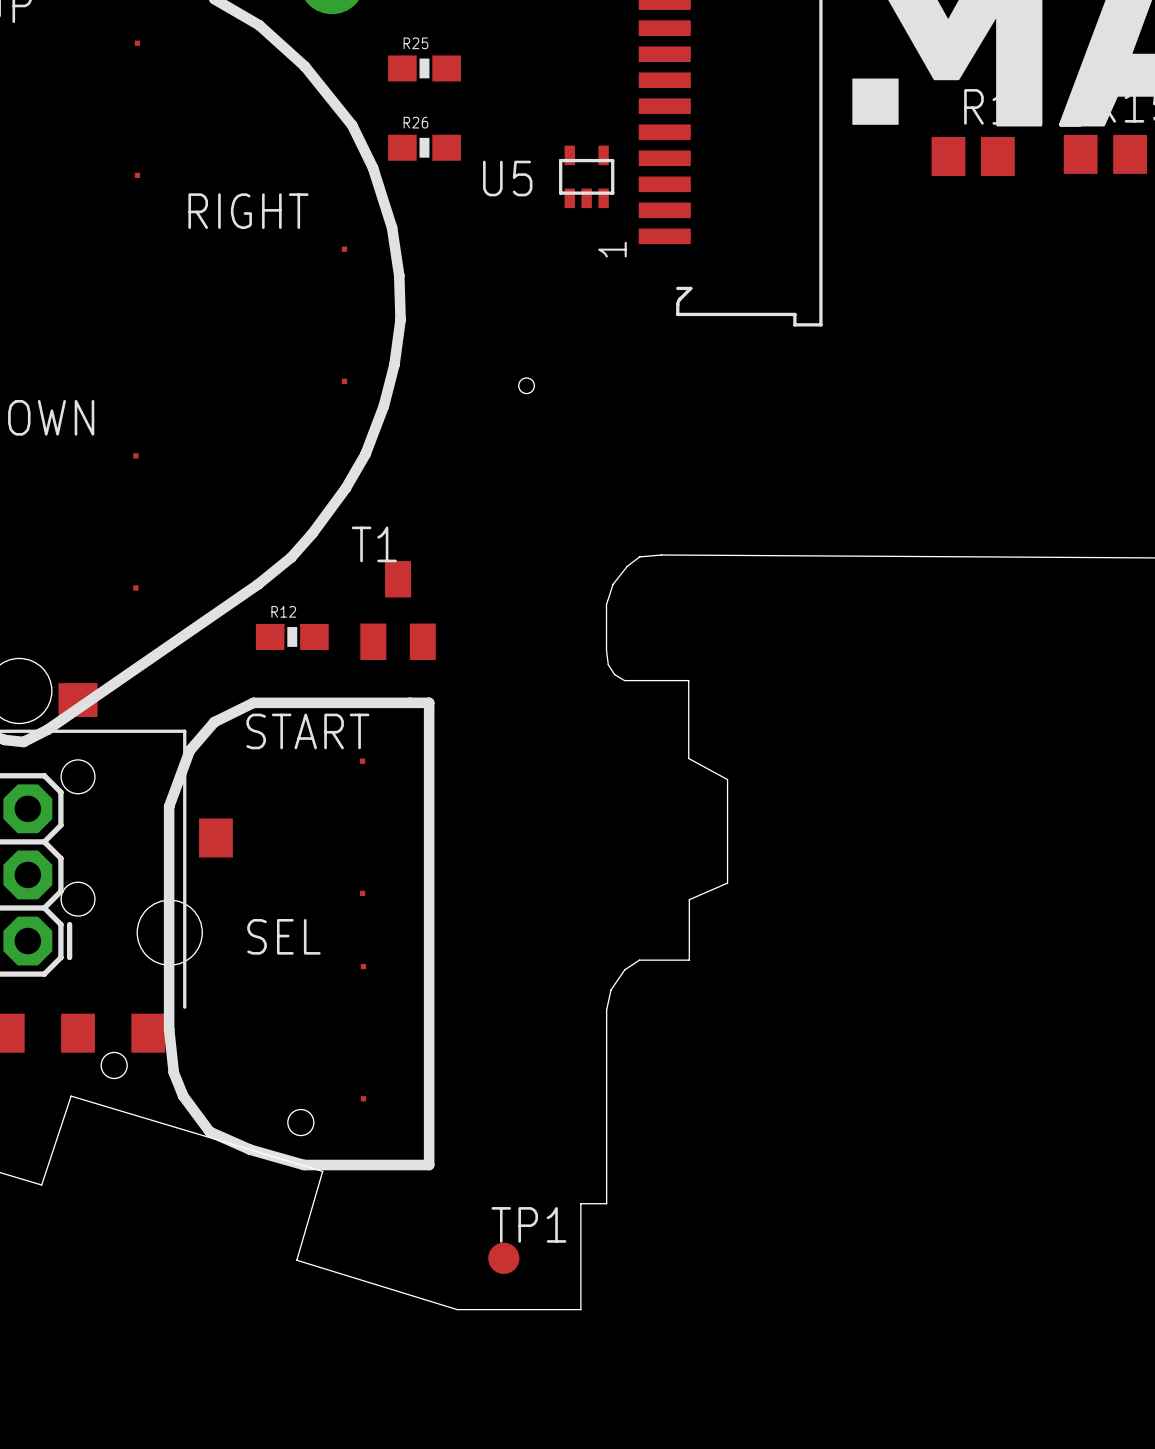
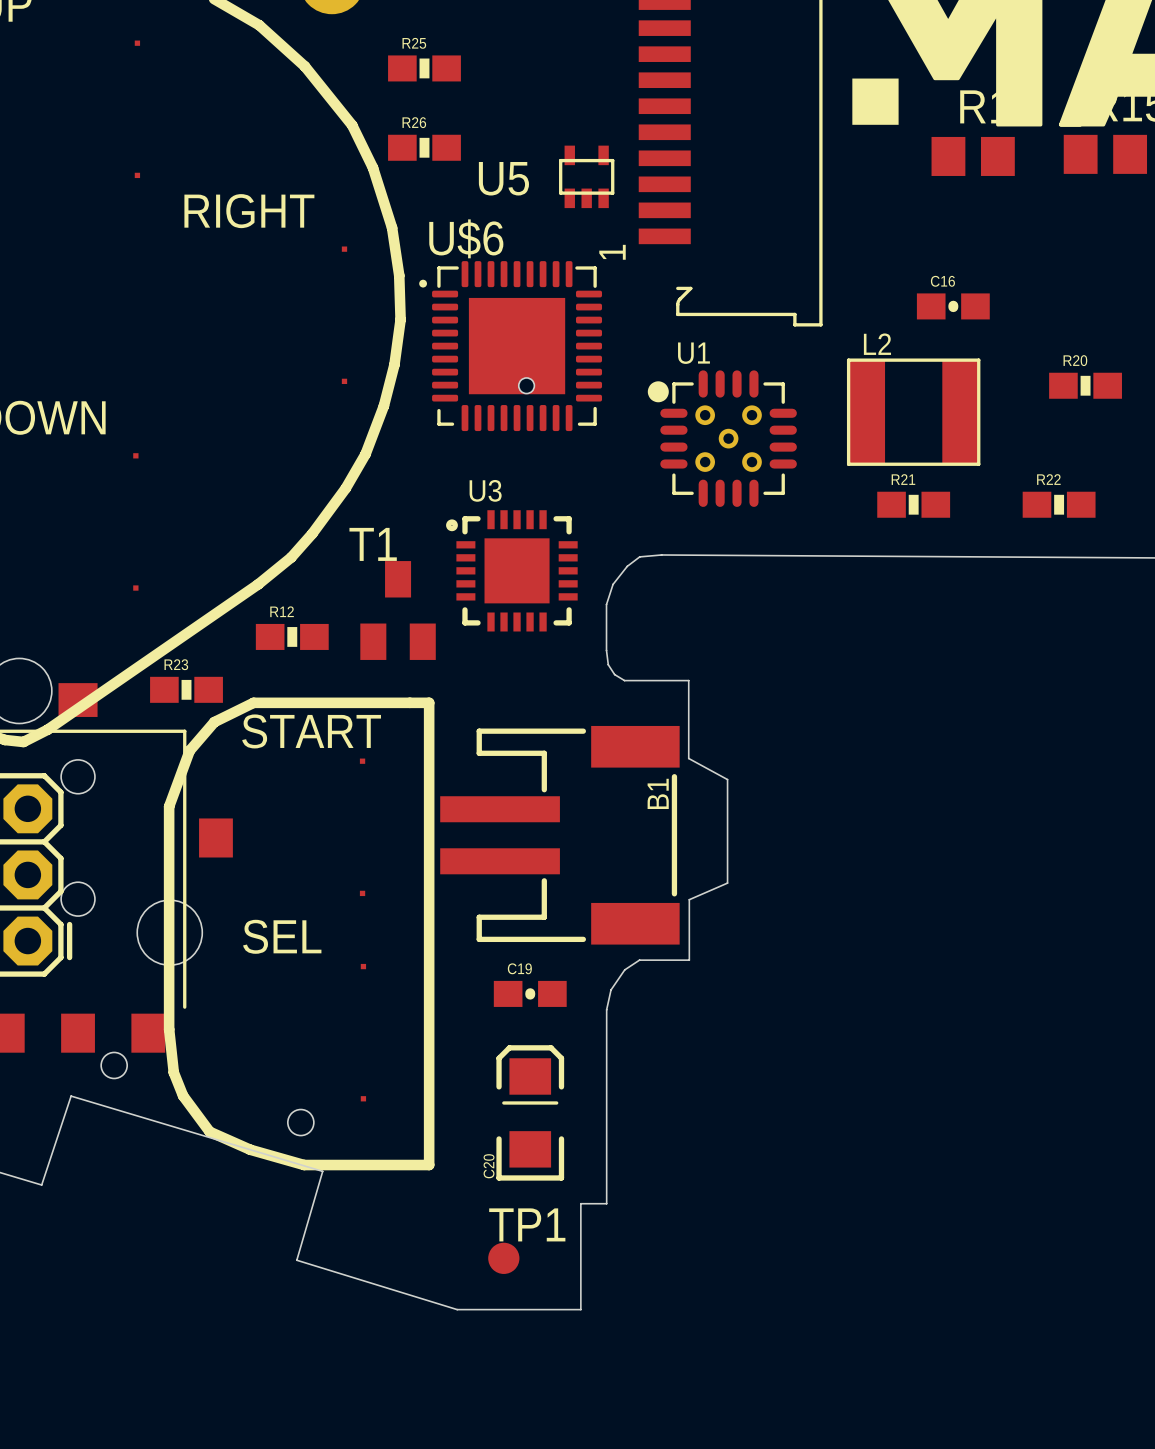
C16: none -> (953, 306)
U$6: none -> (510, 346)
R20: none -> (1085, 385)
L2: none -> (913, 412)
U1: none -> (722, 438)
R21: none -> (913, 504)
R22: none -> (1059, 504)
U3: none -> (511, 570)
R23: none -> (186, 689)
B1: none -> (559, 835)
C19: none -> (530, 993)
C20: none -> (530, 1112)

